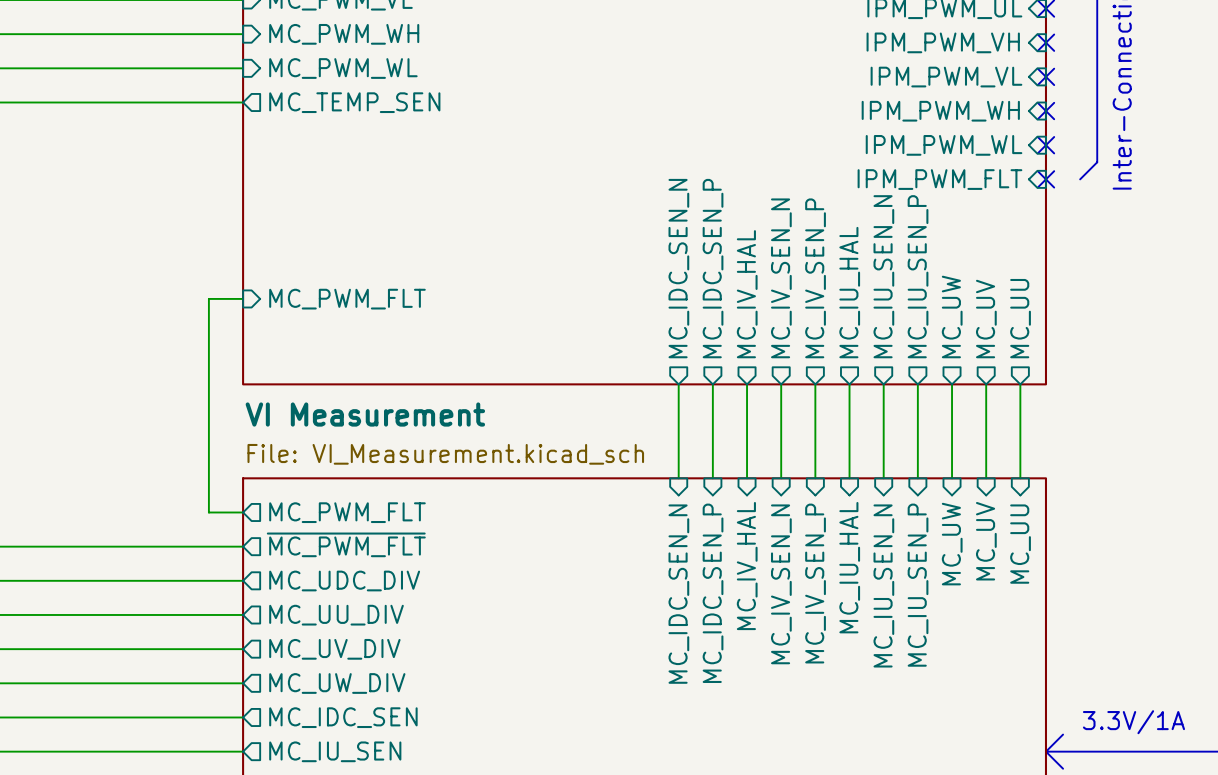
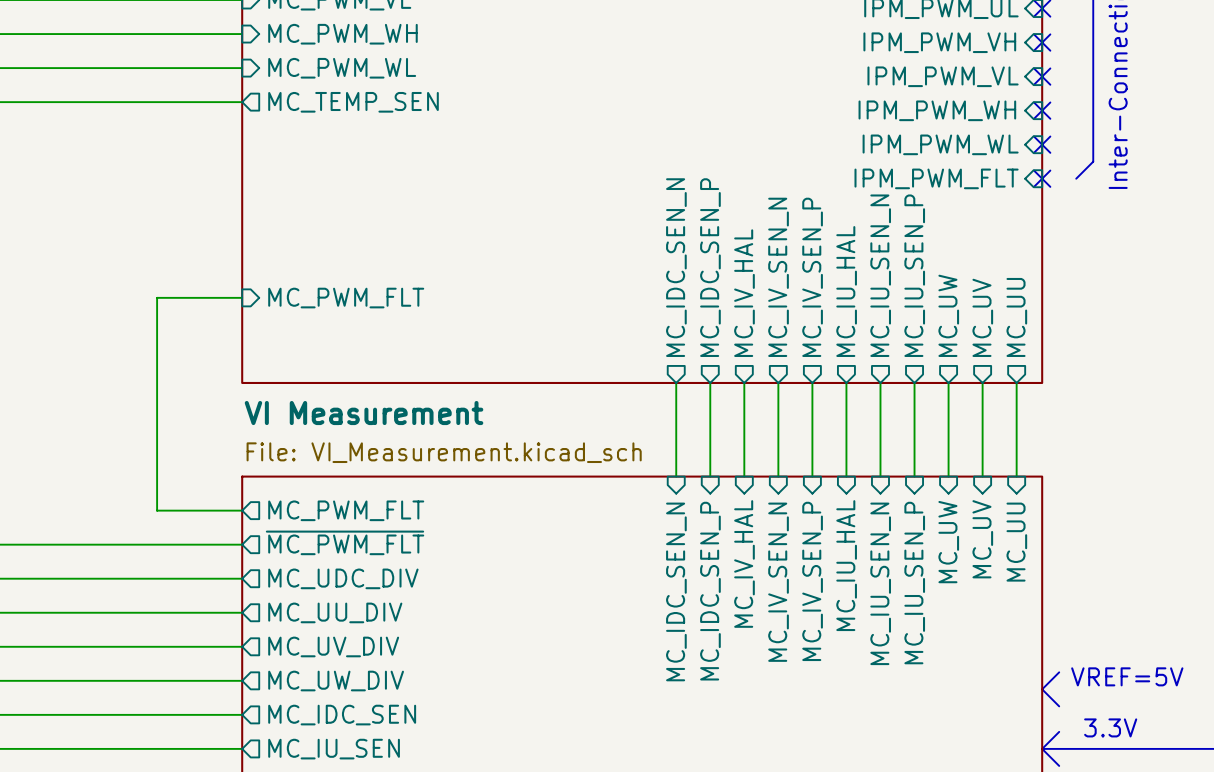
wire: (208, 298) (208, 512) -> (208, 297) (157, 297) (157, 510) (208, 510)
line: none -> (1059, 672) (1042, 689) (1059, 706)
text: none -> VREF=5V (1127, 676)
text: 3.3V/1A (1133, 722) -> 3.3V (1110, 727)

